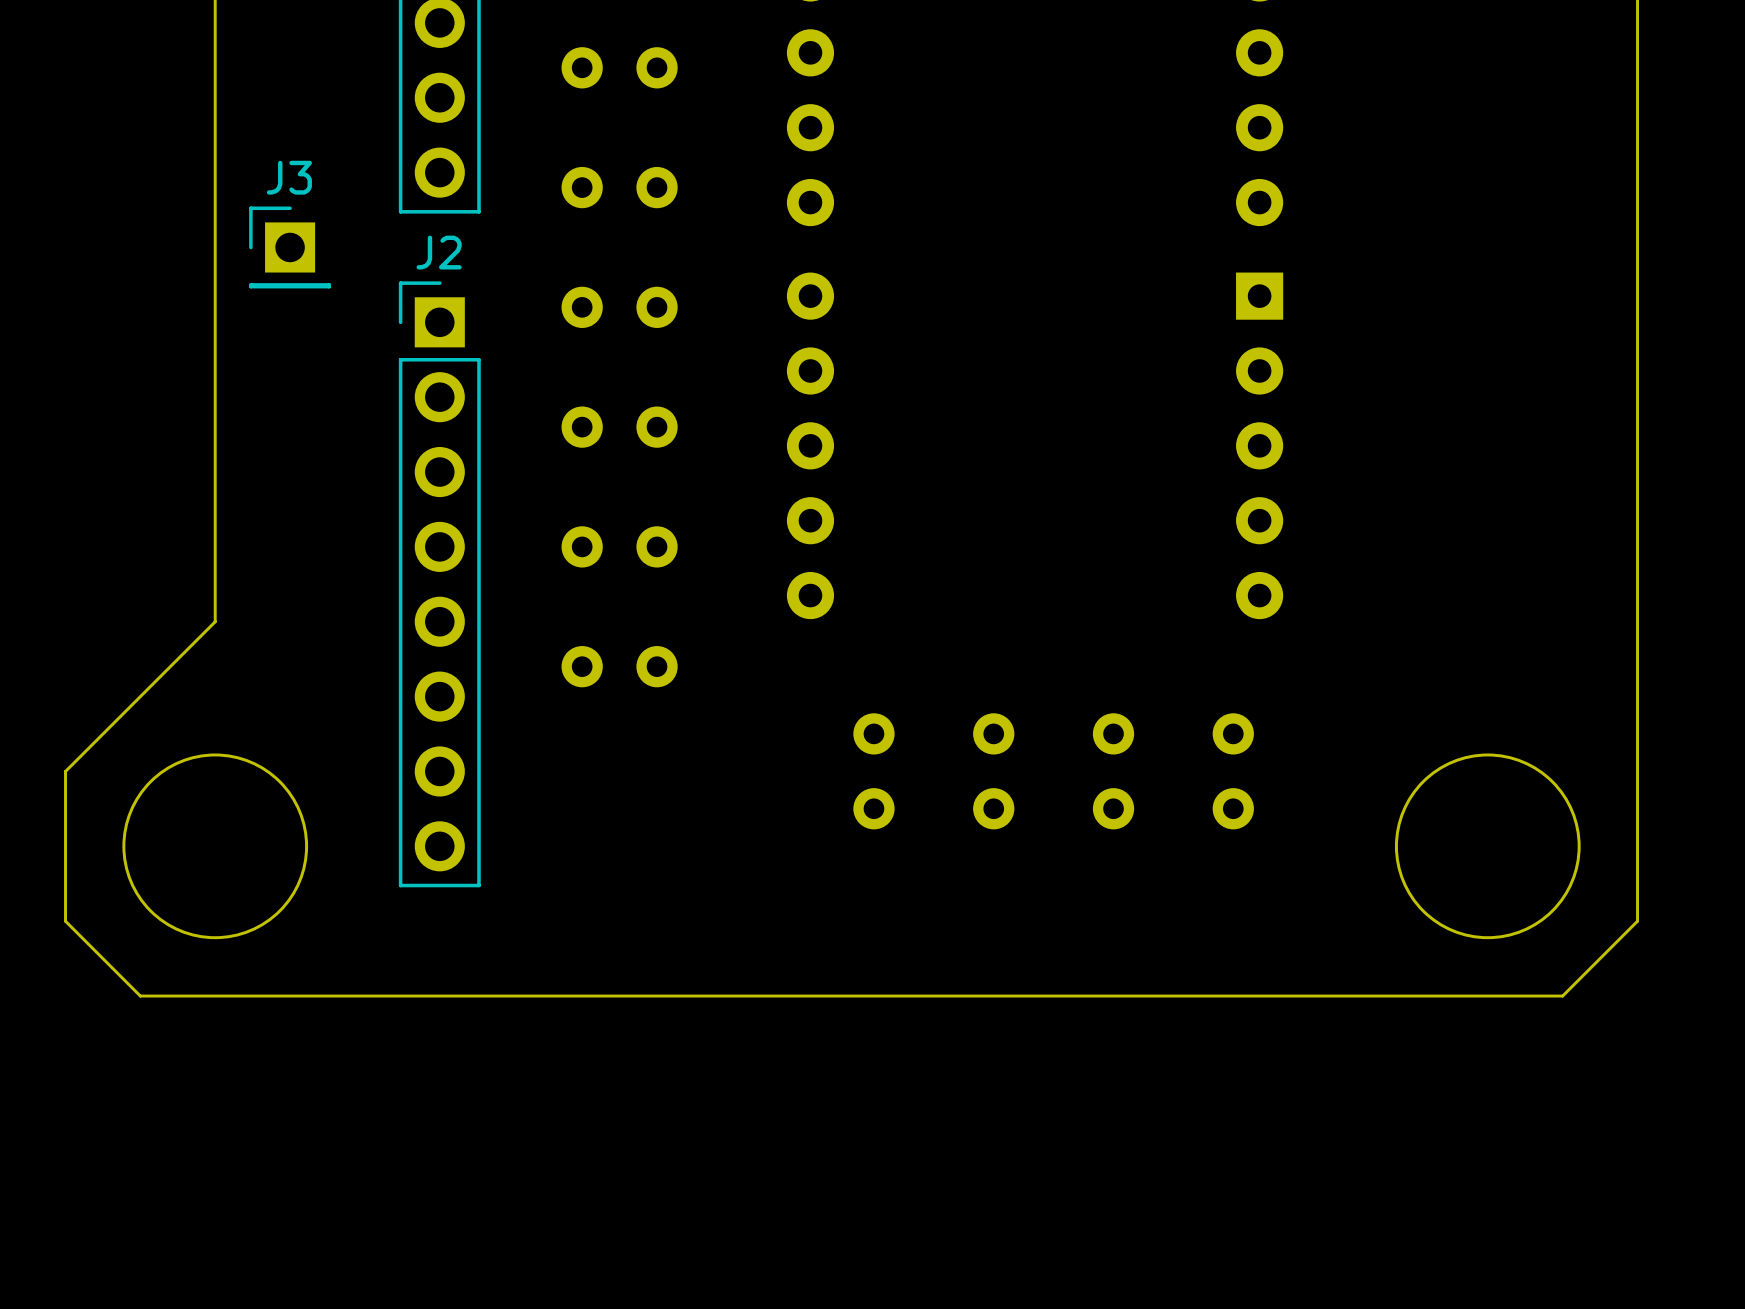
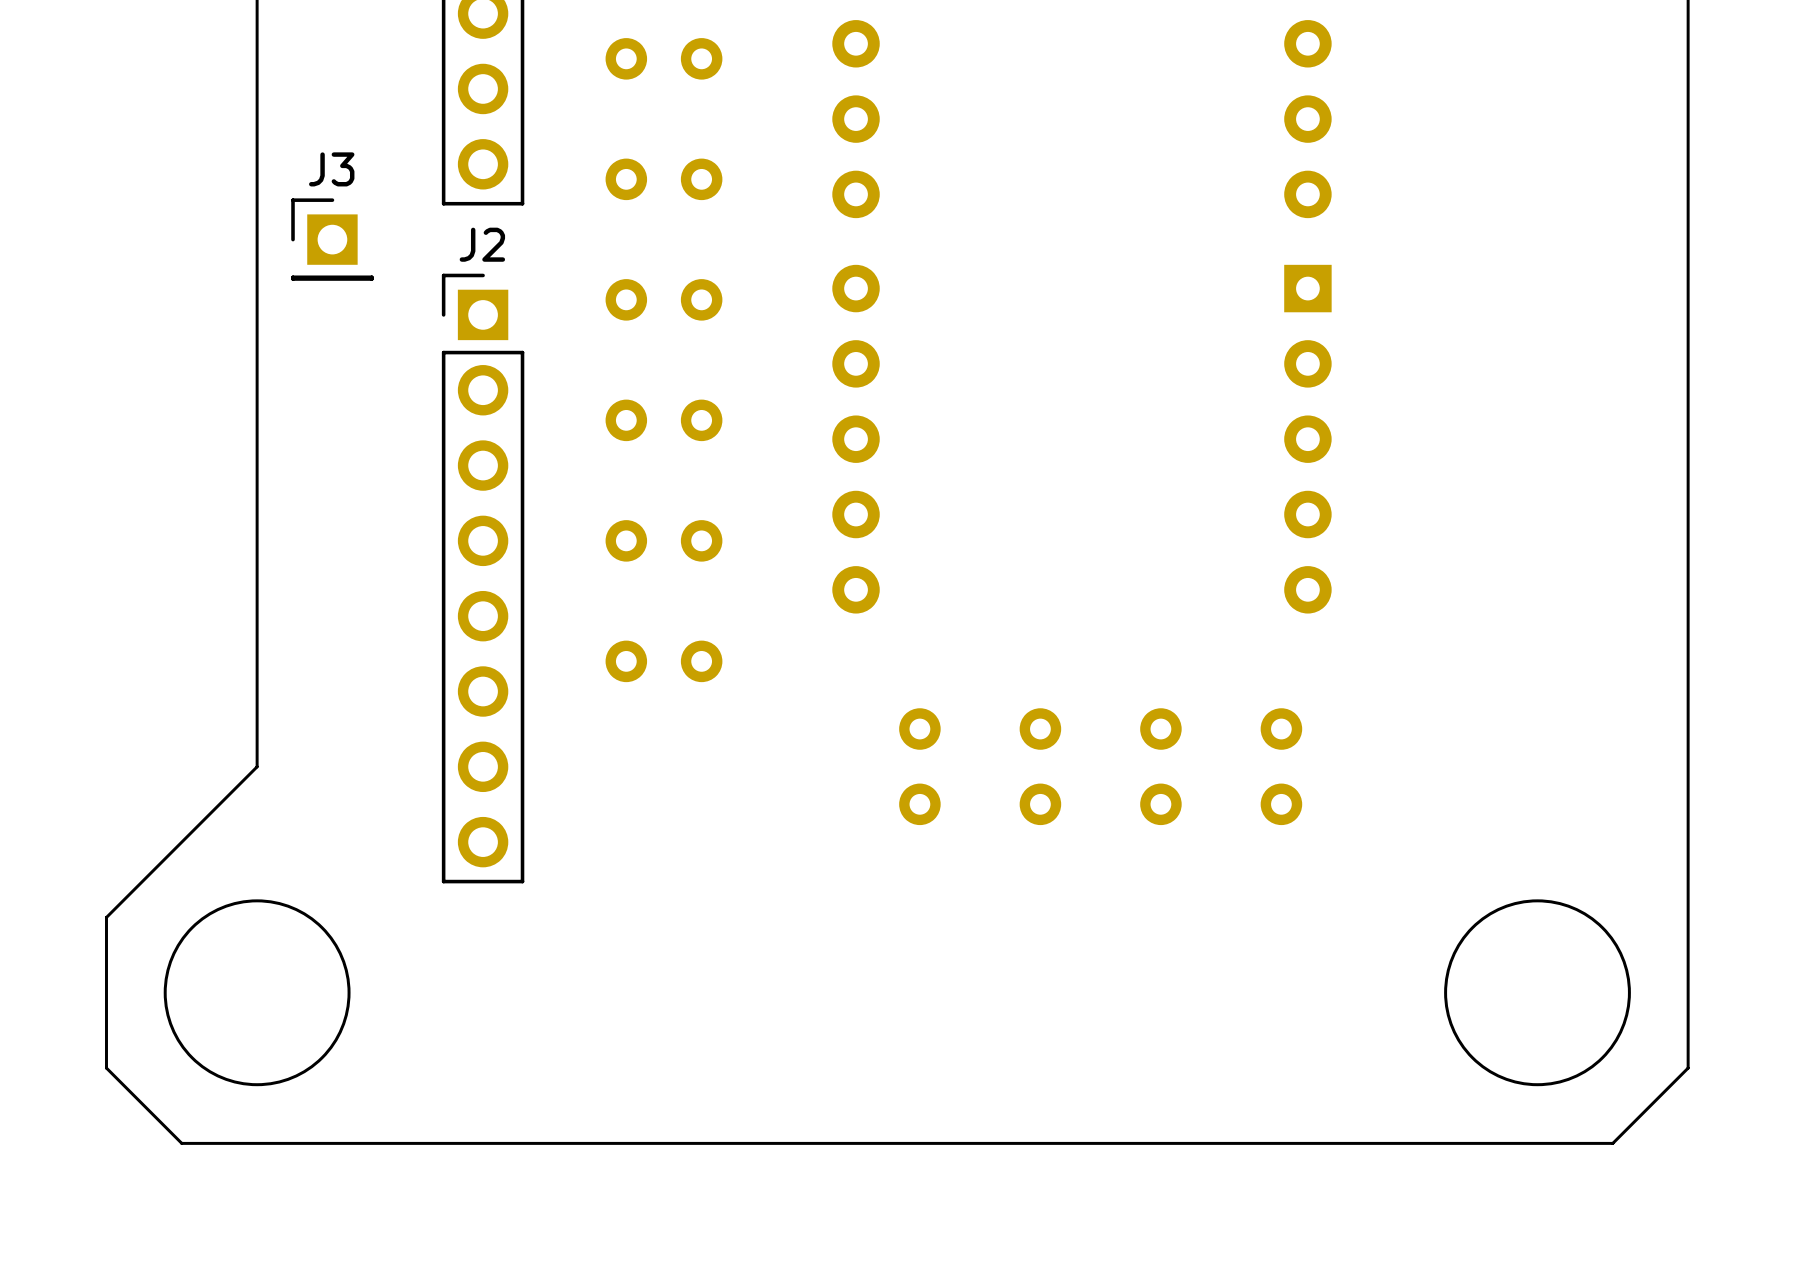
board edge: (215, 621) (65, 771) (65, 921) (140, 996) (1562, 996) (1637, 921) -> (257, 616) (257, 766) (106, 917) (106, 1068) (181, 1143) (1612, 1143) (1688, 1068) (1688, 917)
round board edge position: (215, 846) -> (257, 992)
round board edge position: (1487, 846) -> (1537, 992)

